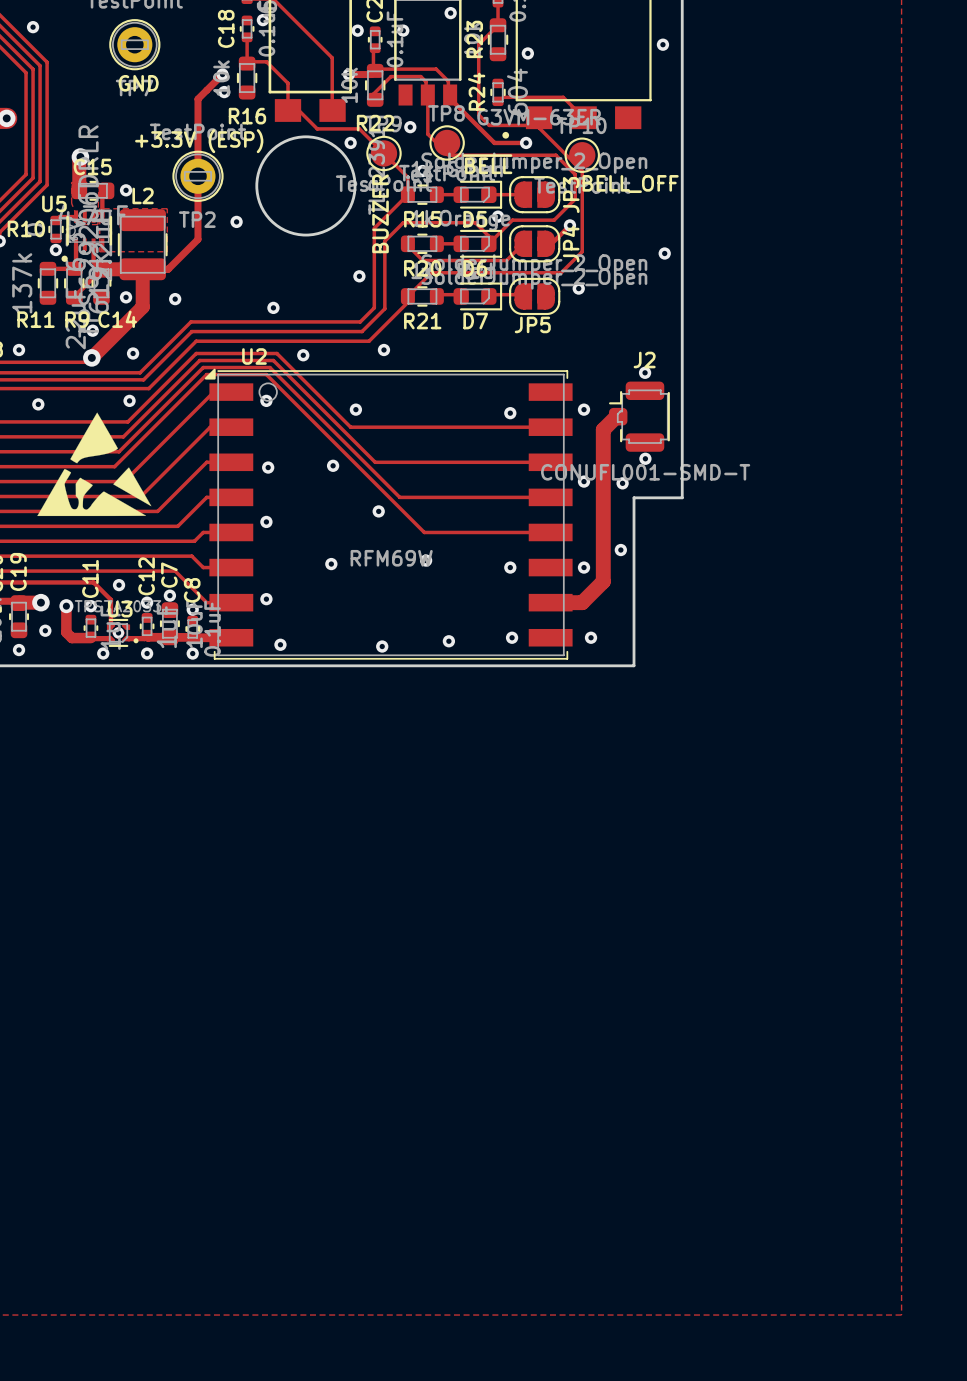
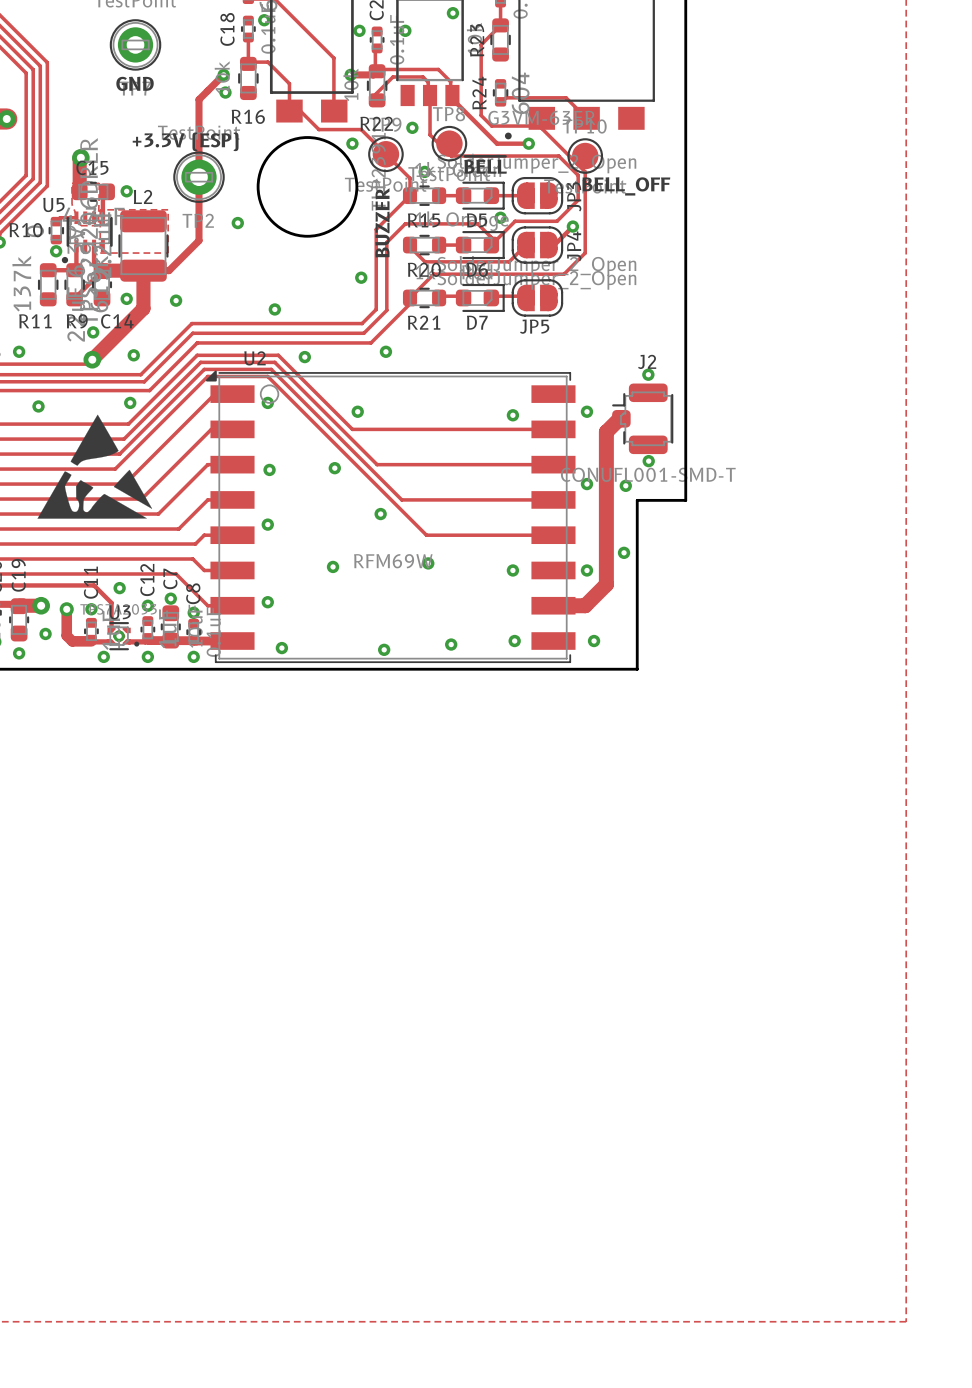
via: (33, 27) -> none
via: (662, 44) -> none
via: (527, 53) -> none
via: (664, 253) -> none
via: (578, 288) -> none

